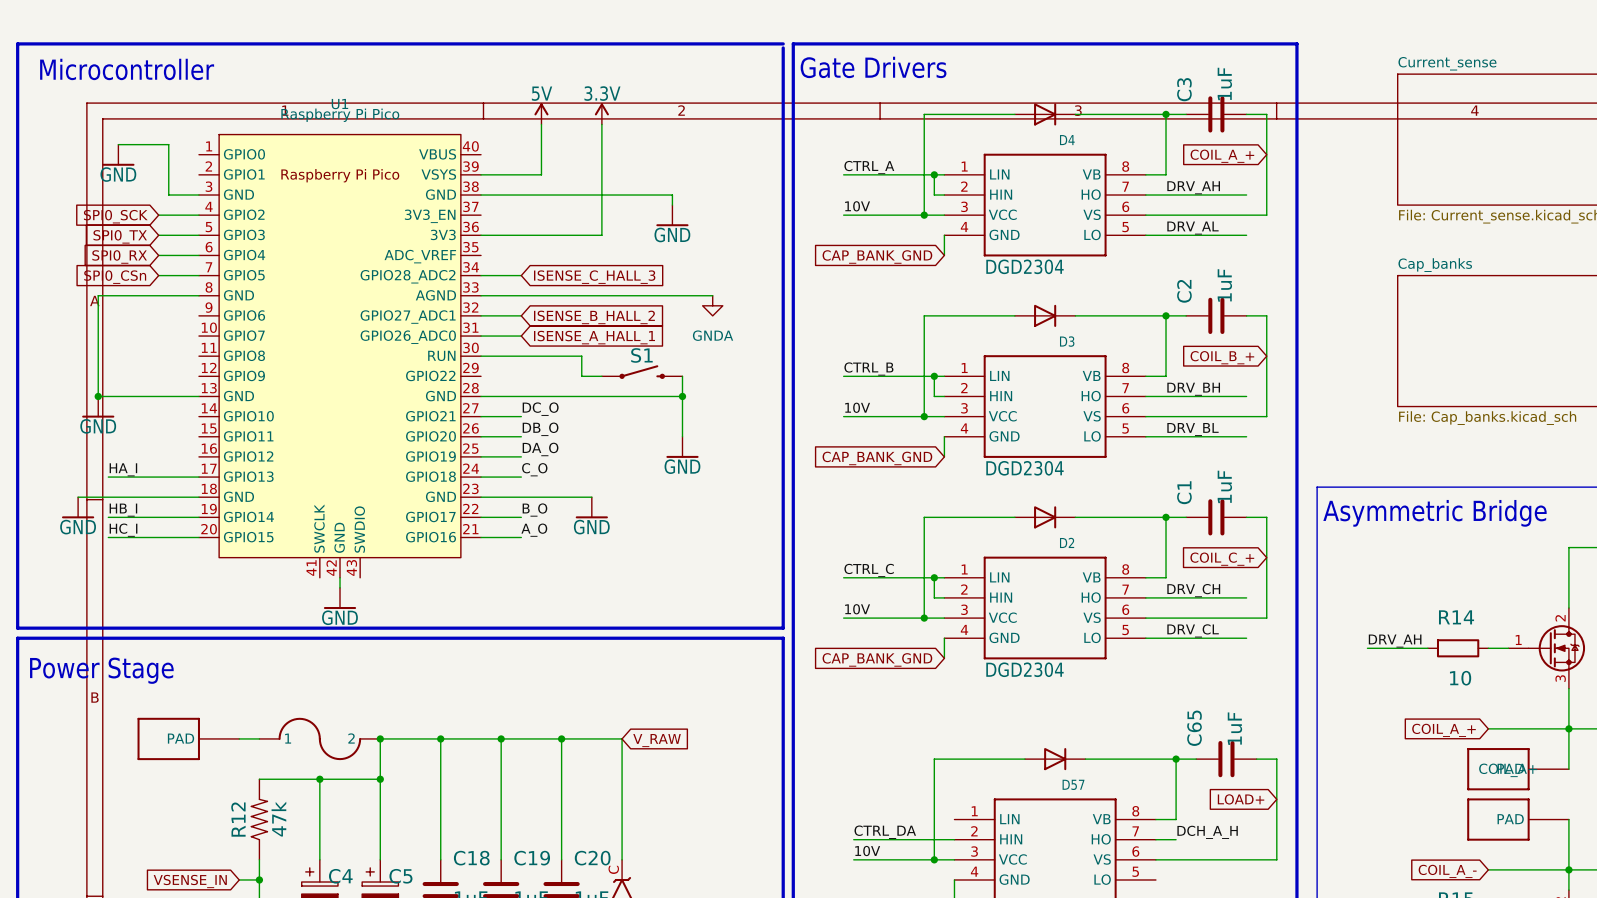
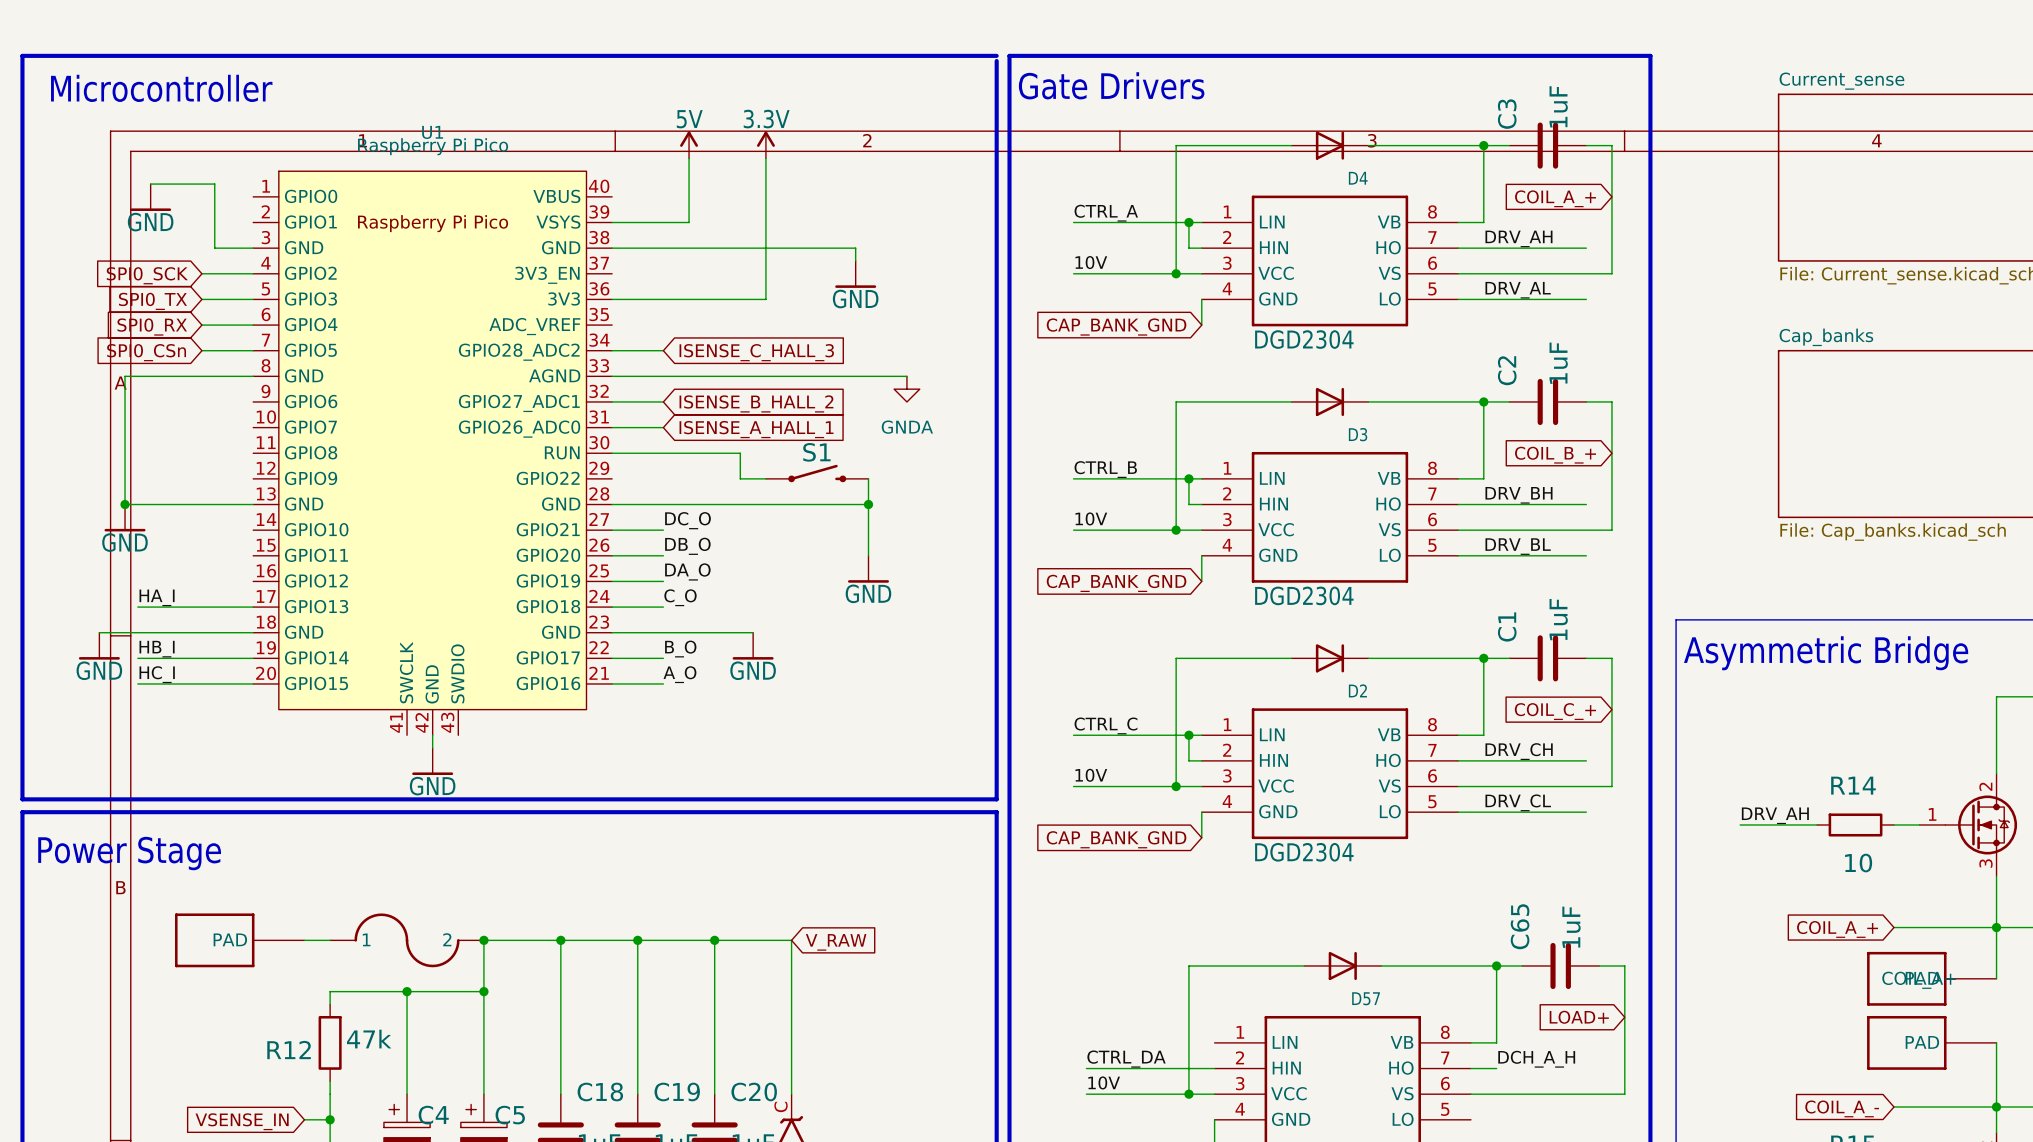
R12 symbol: [250, 779, 269, 860] -> [318, 1004, 342, 1082]

